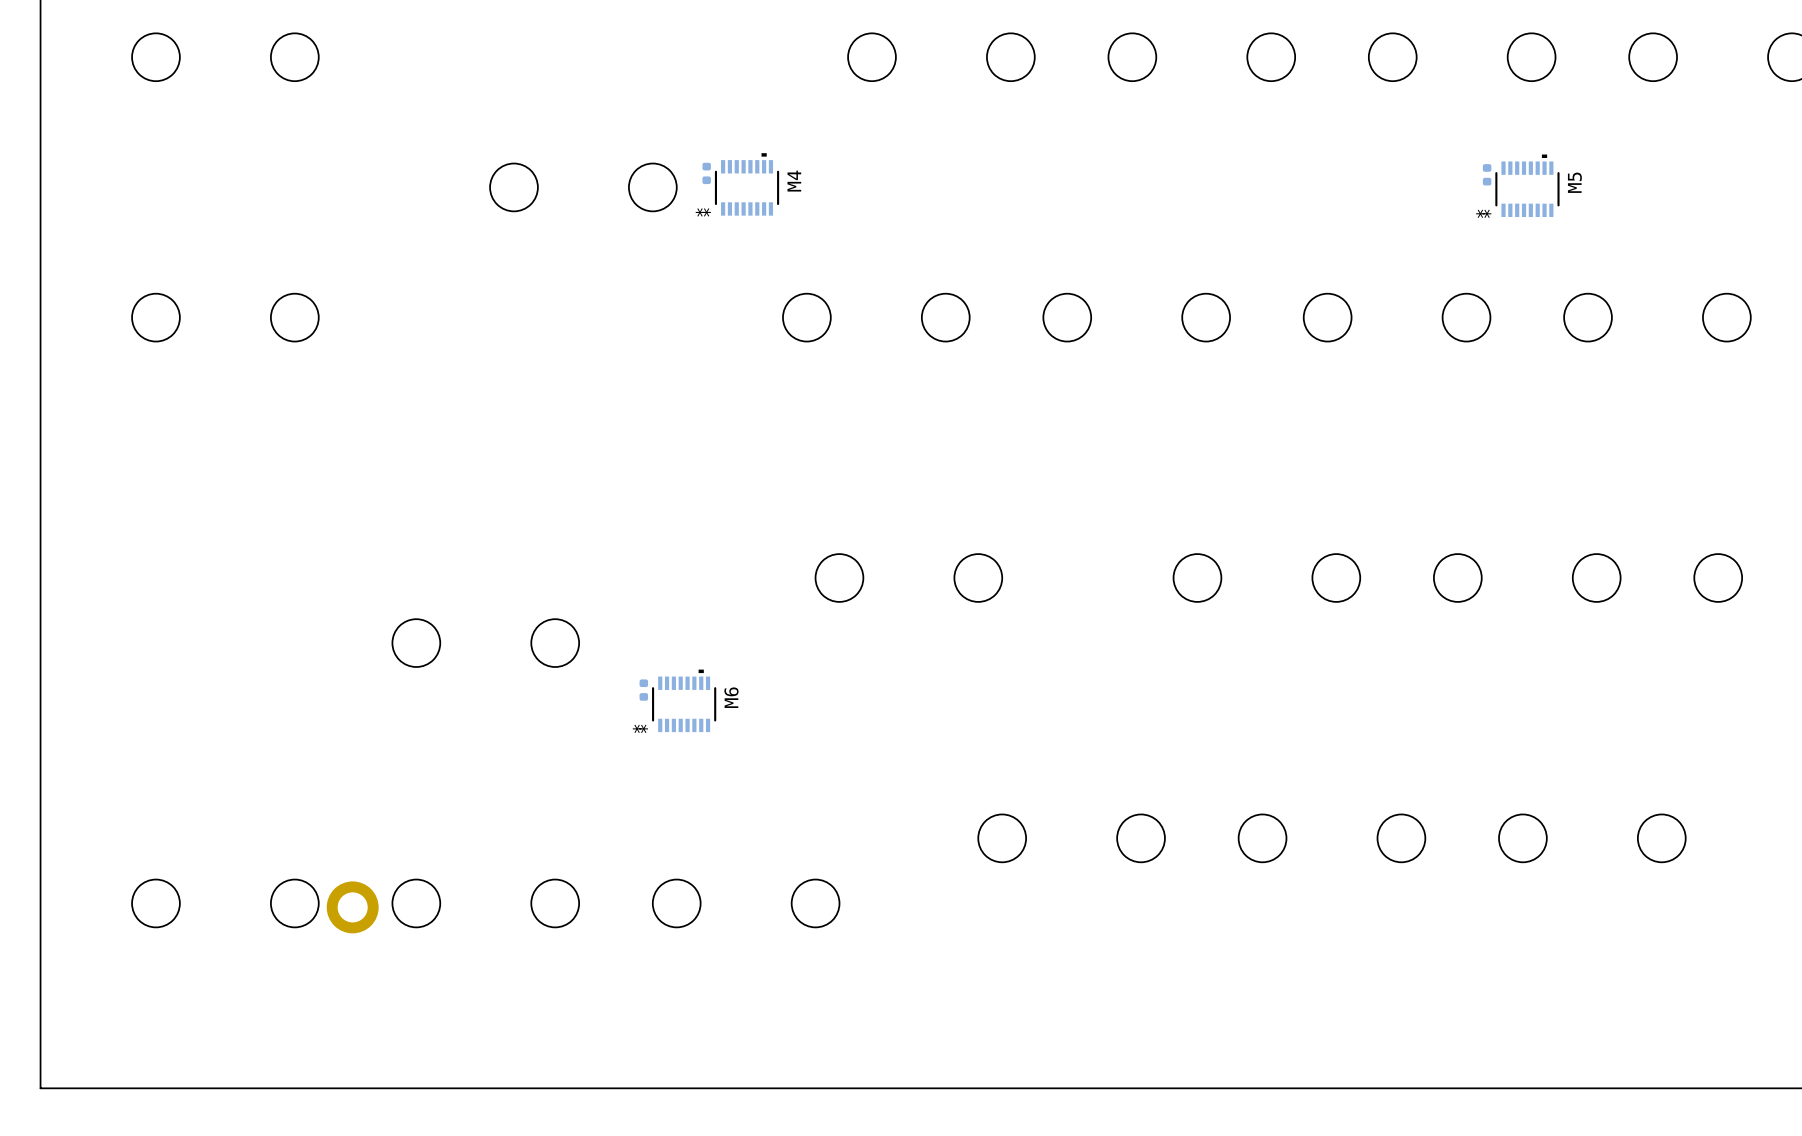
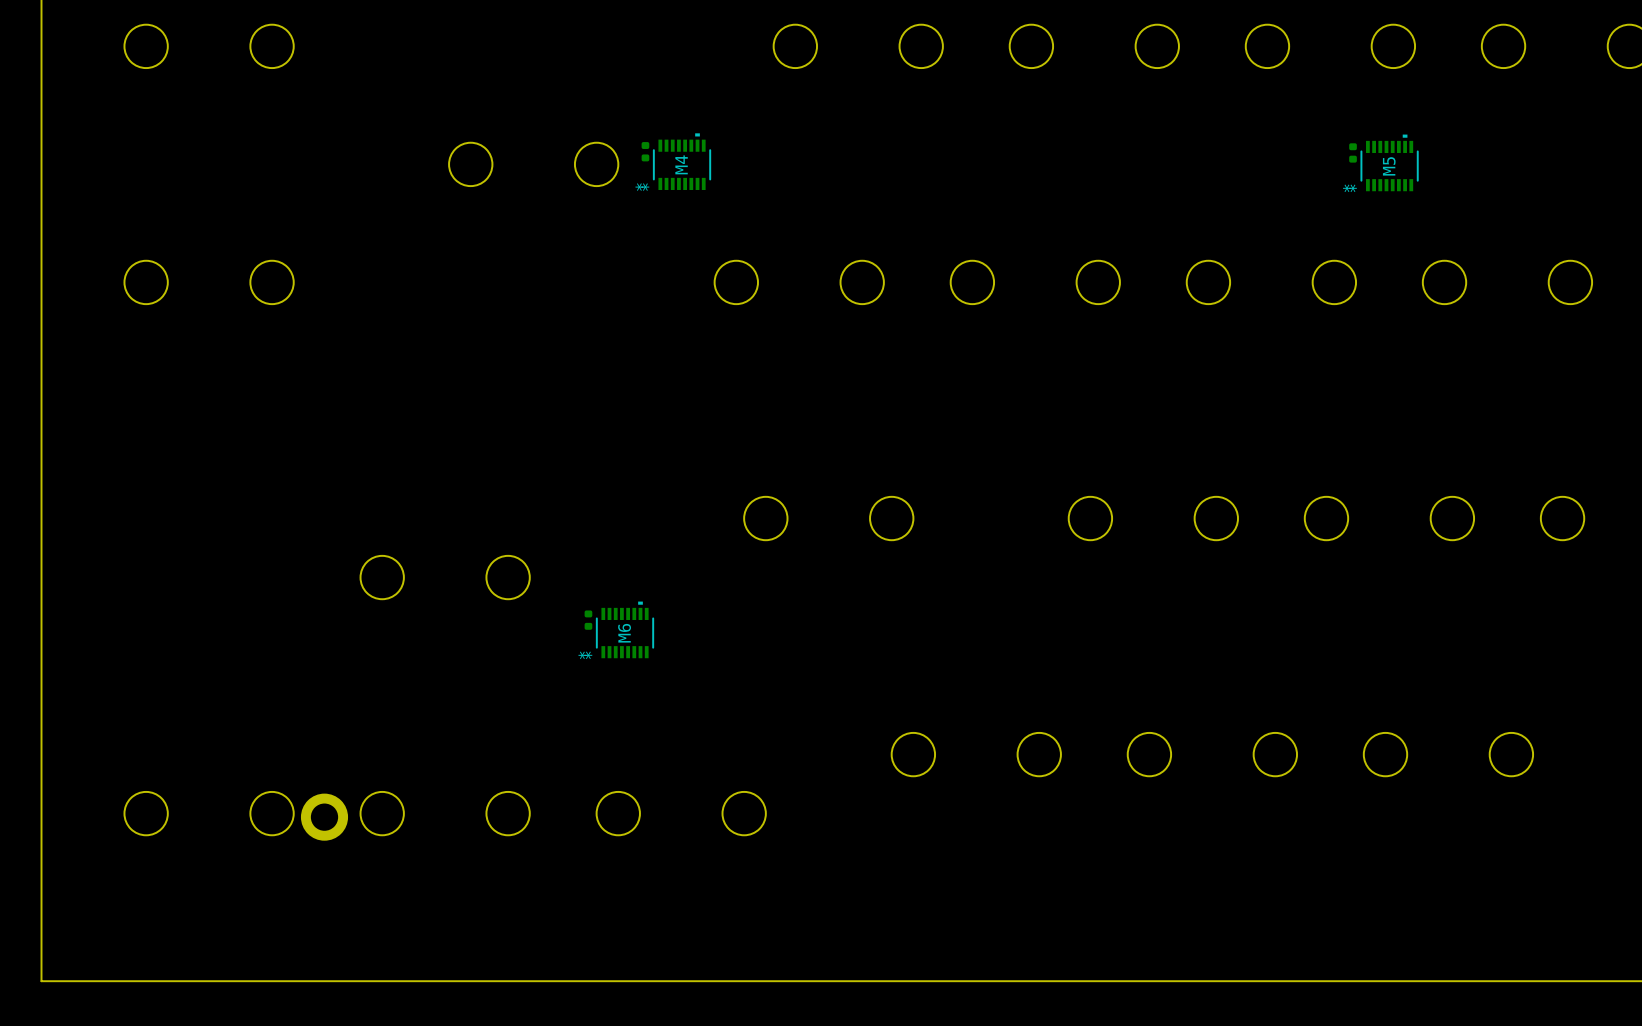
M4 name position: M4 (794, 181) -> M4 (681, 164)
M5 name position: M5 (1574, 182) -> M5 (1389, 166)
M6 name position: M6 (731, 697) -> M6 (624, 633)

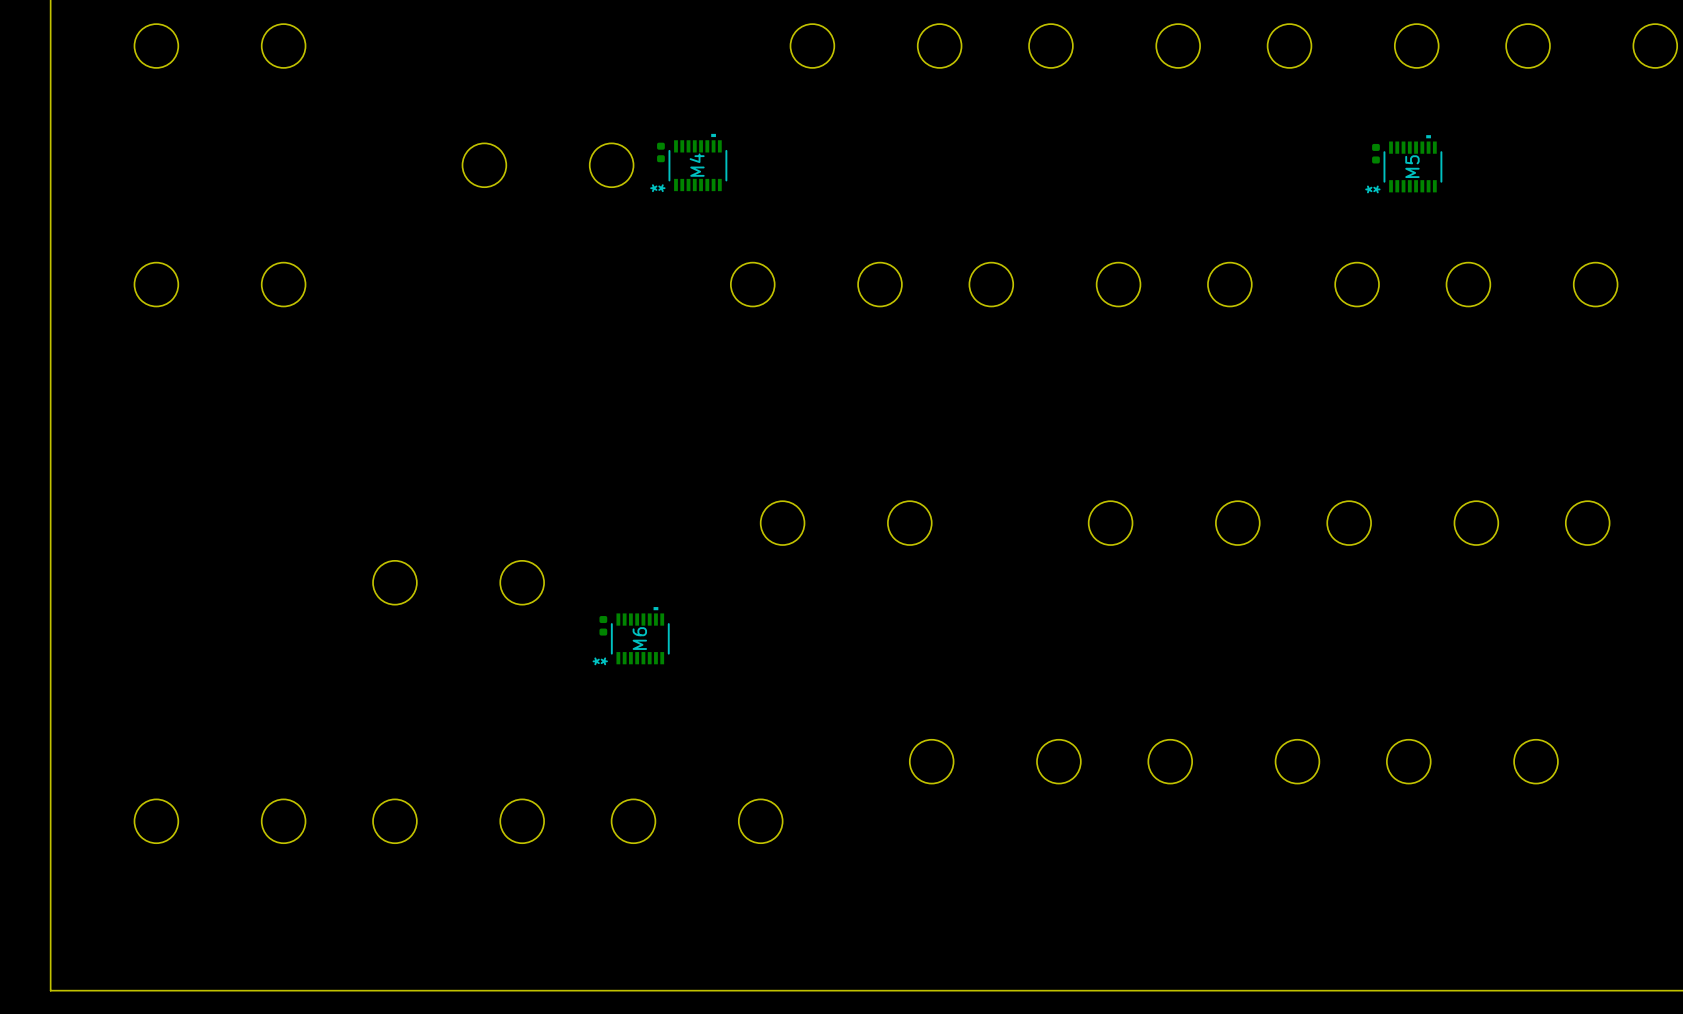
part: (324, 817) -> none

